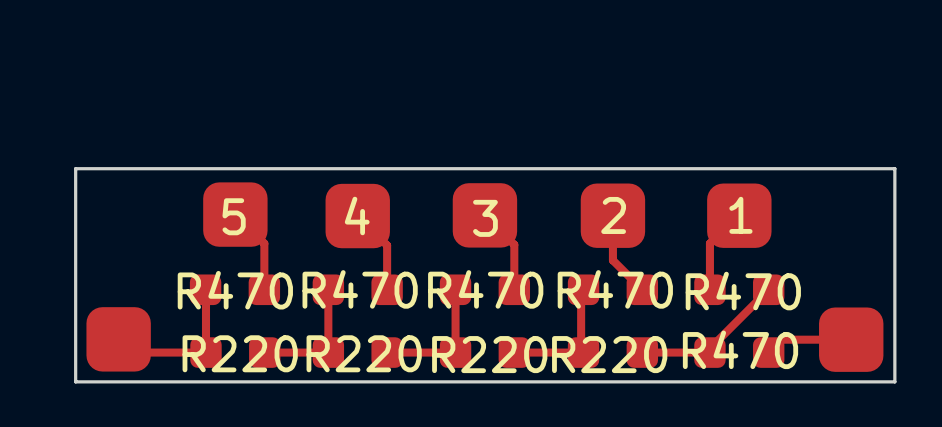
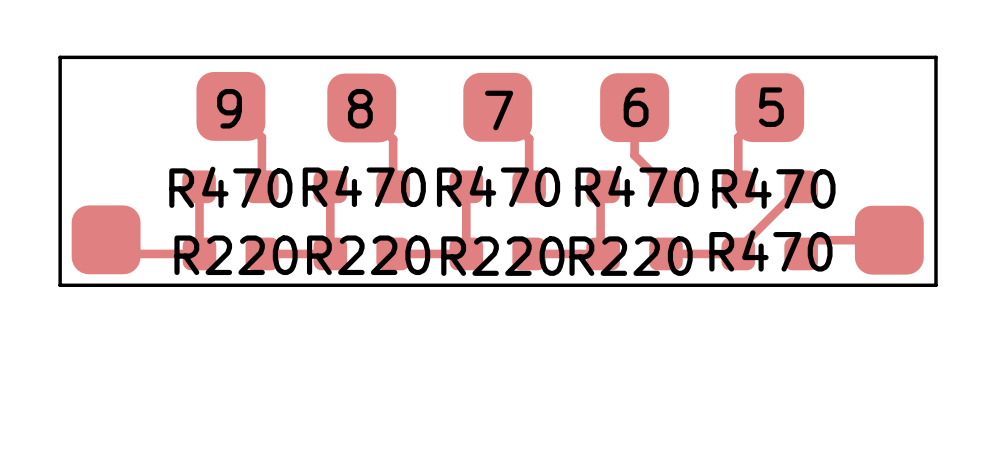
text: 4 (357, 215) -> 8 (360, 108)
text: 2 (613, 215) -> 6 (636, 107)
text: 1 (740, 215) -> 5 (771, 107)
text: 5 (234, 216) -> 9 (229, 108)
text: 3 (485, 218) -> 7 (499, 110)

